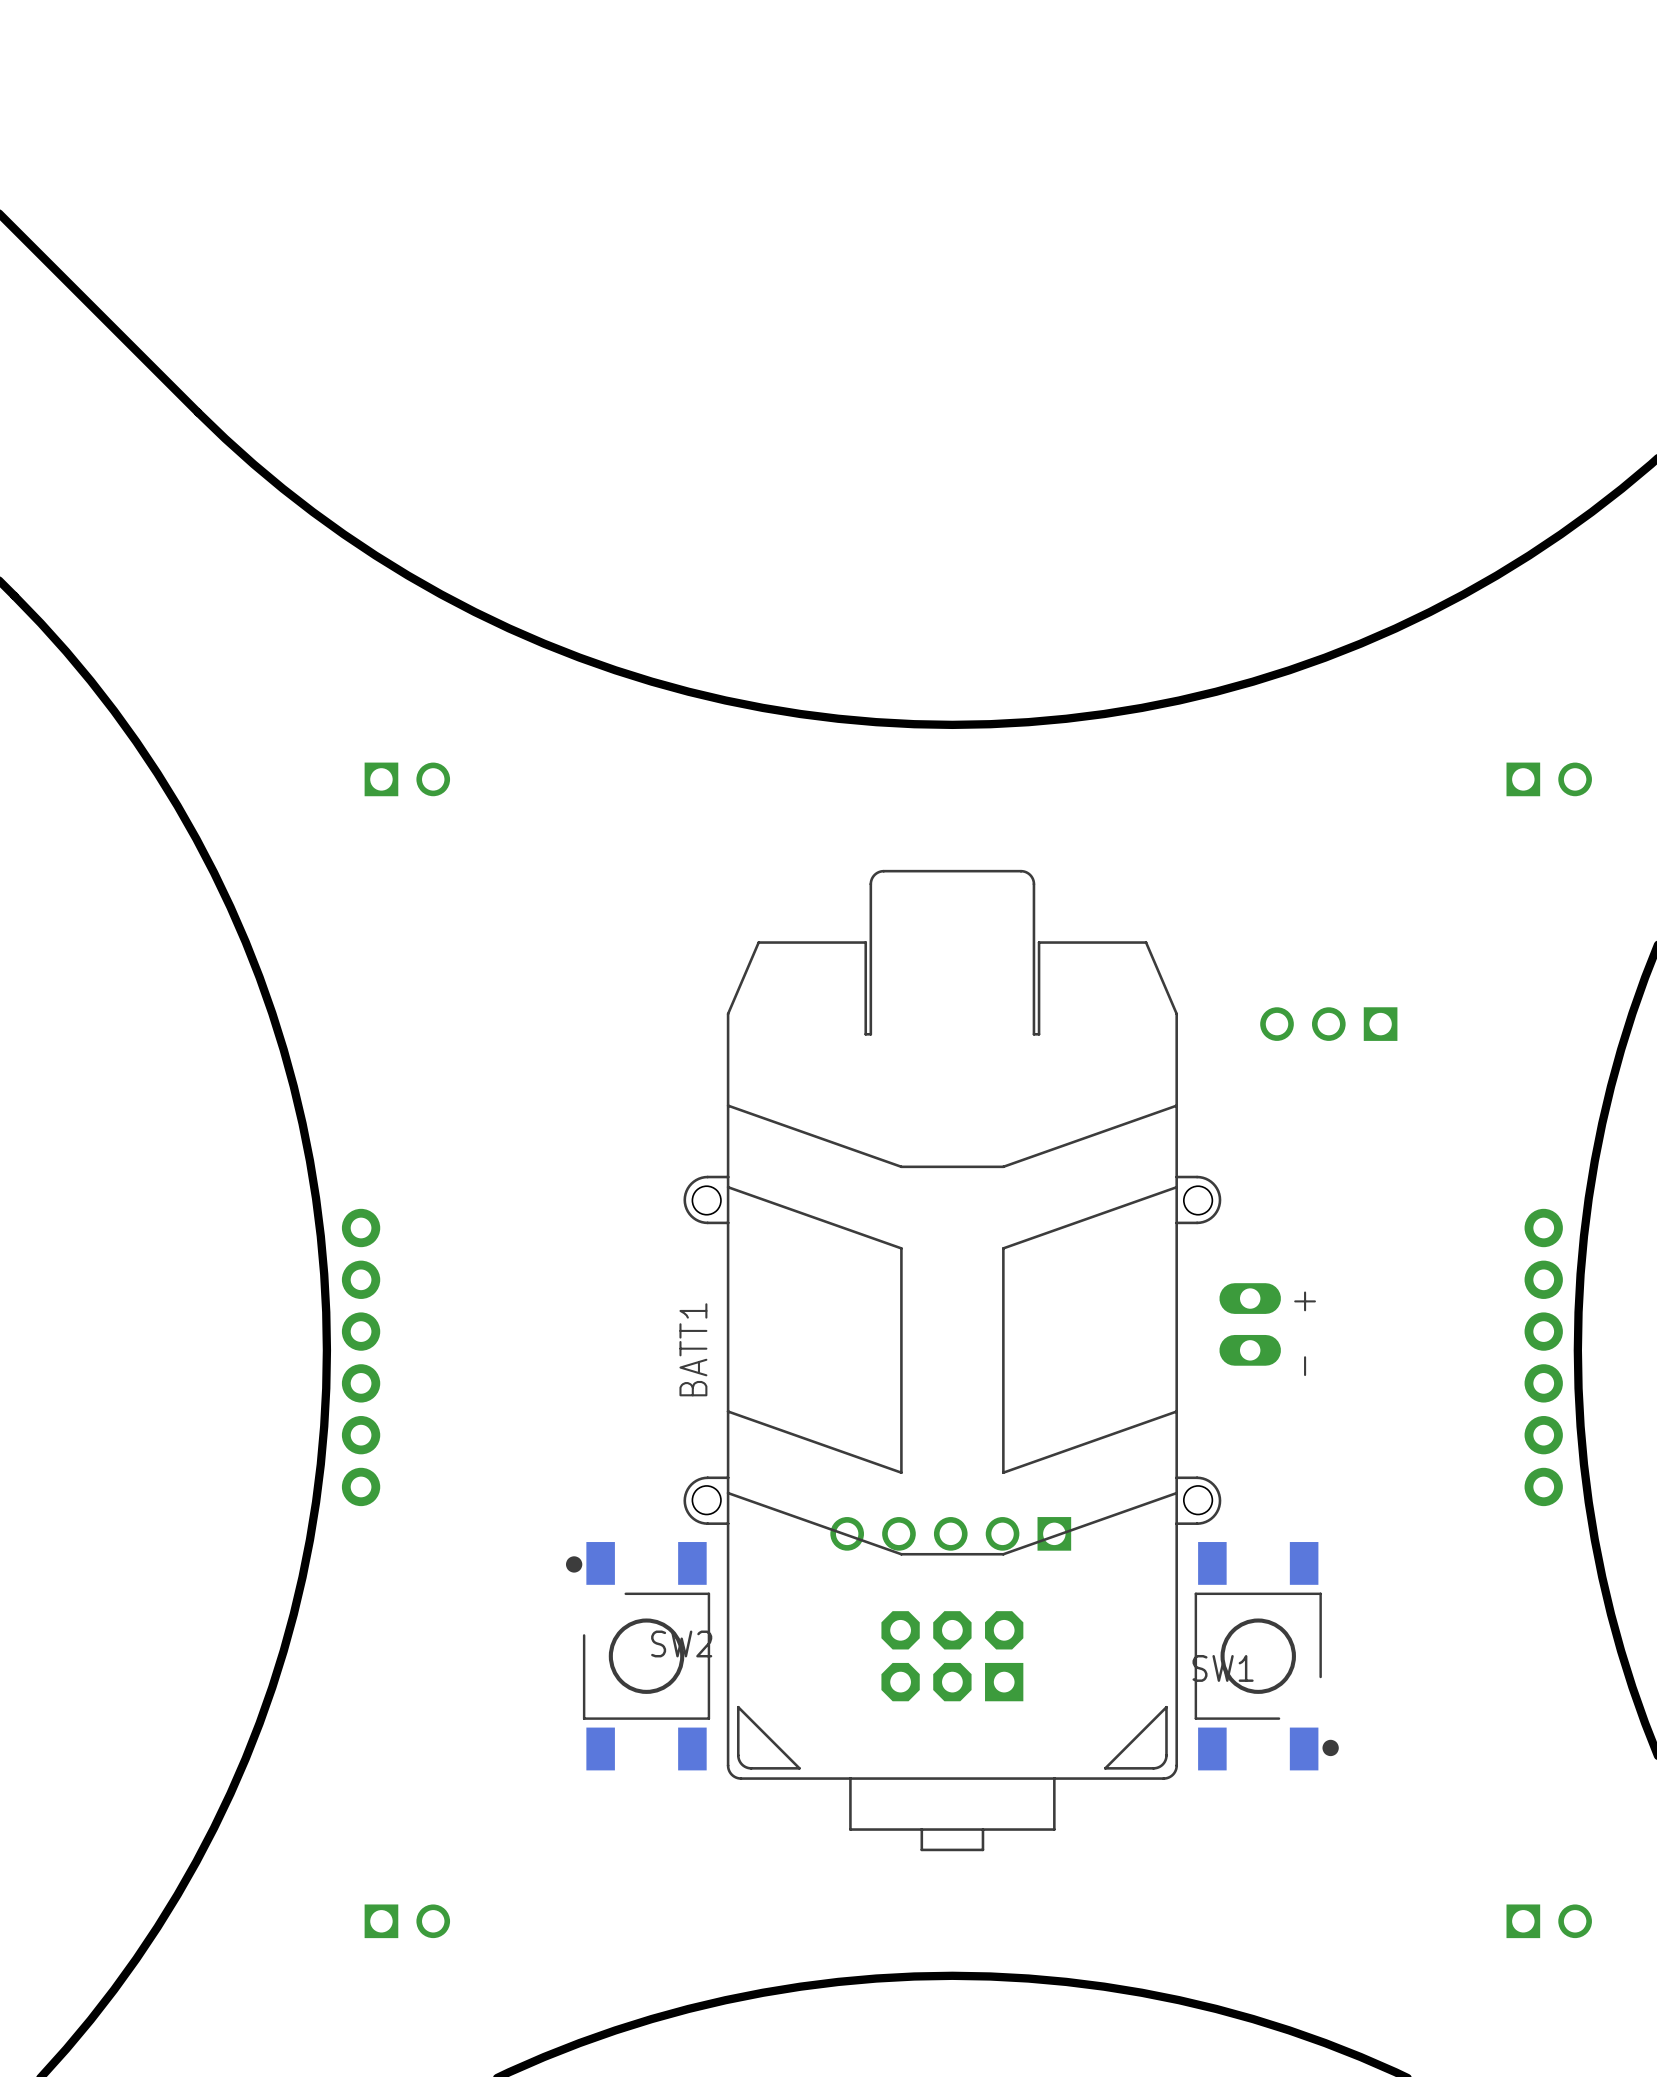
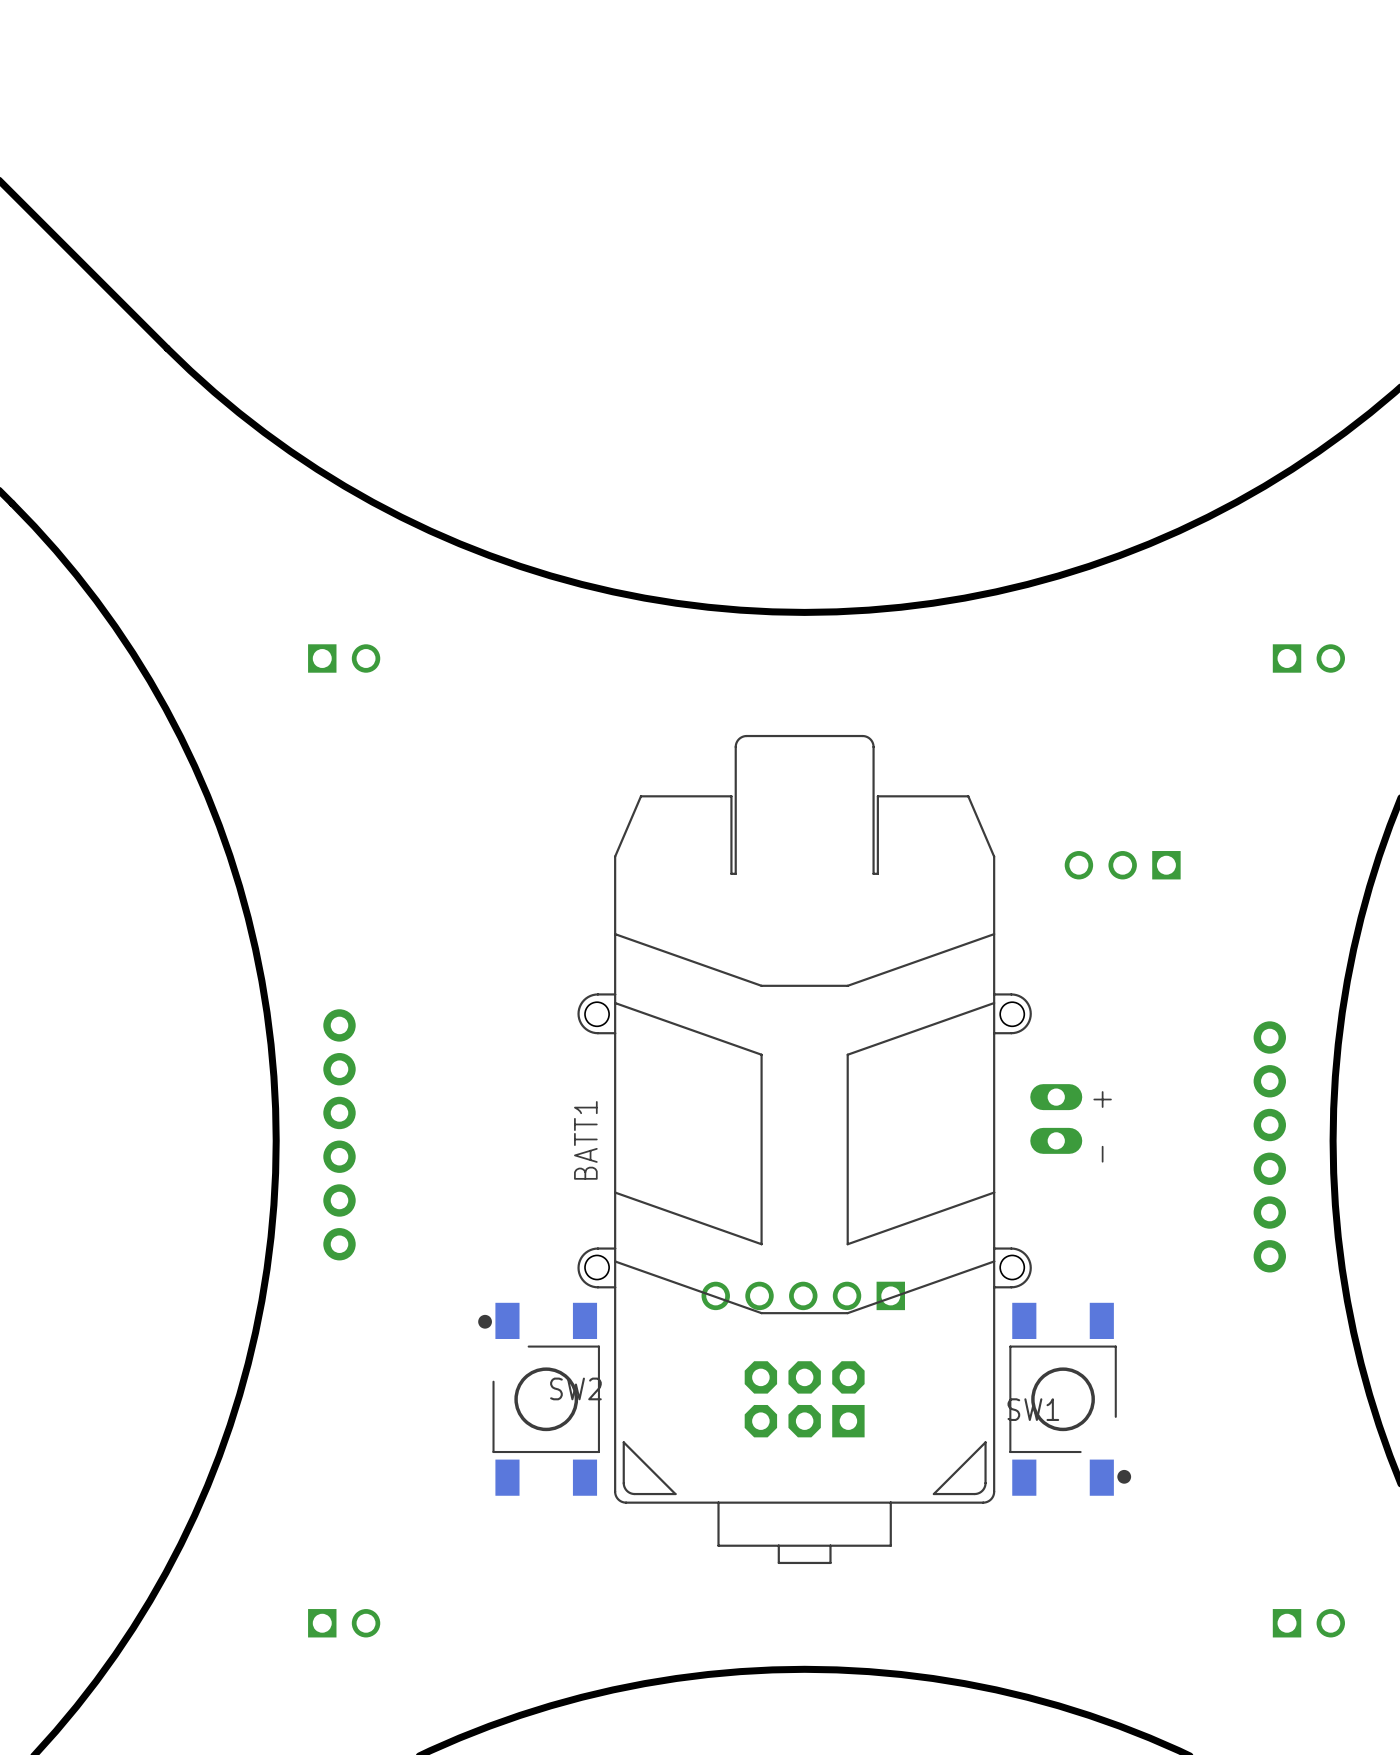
part position: (361, 1357) -> (339, 1134)
part position: (1543, 1357) -> (1269, 1146)

